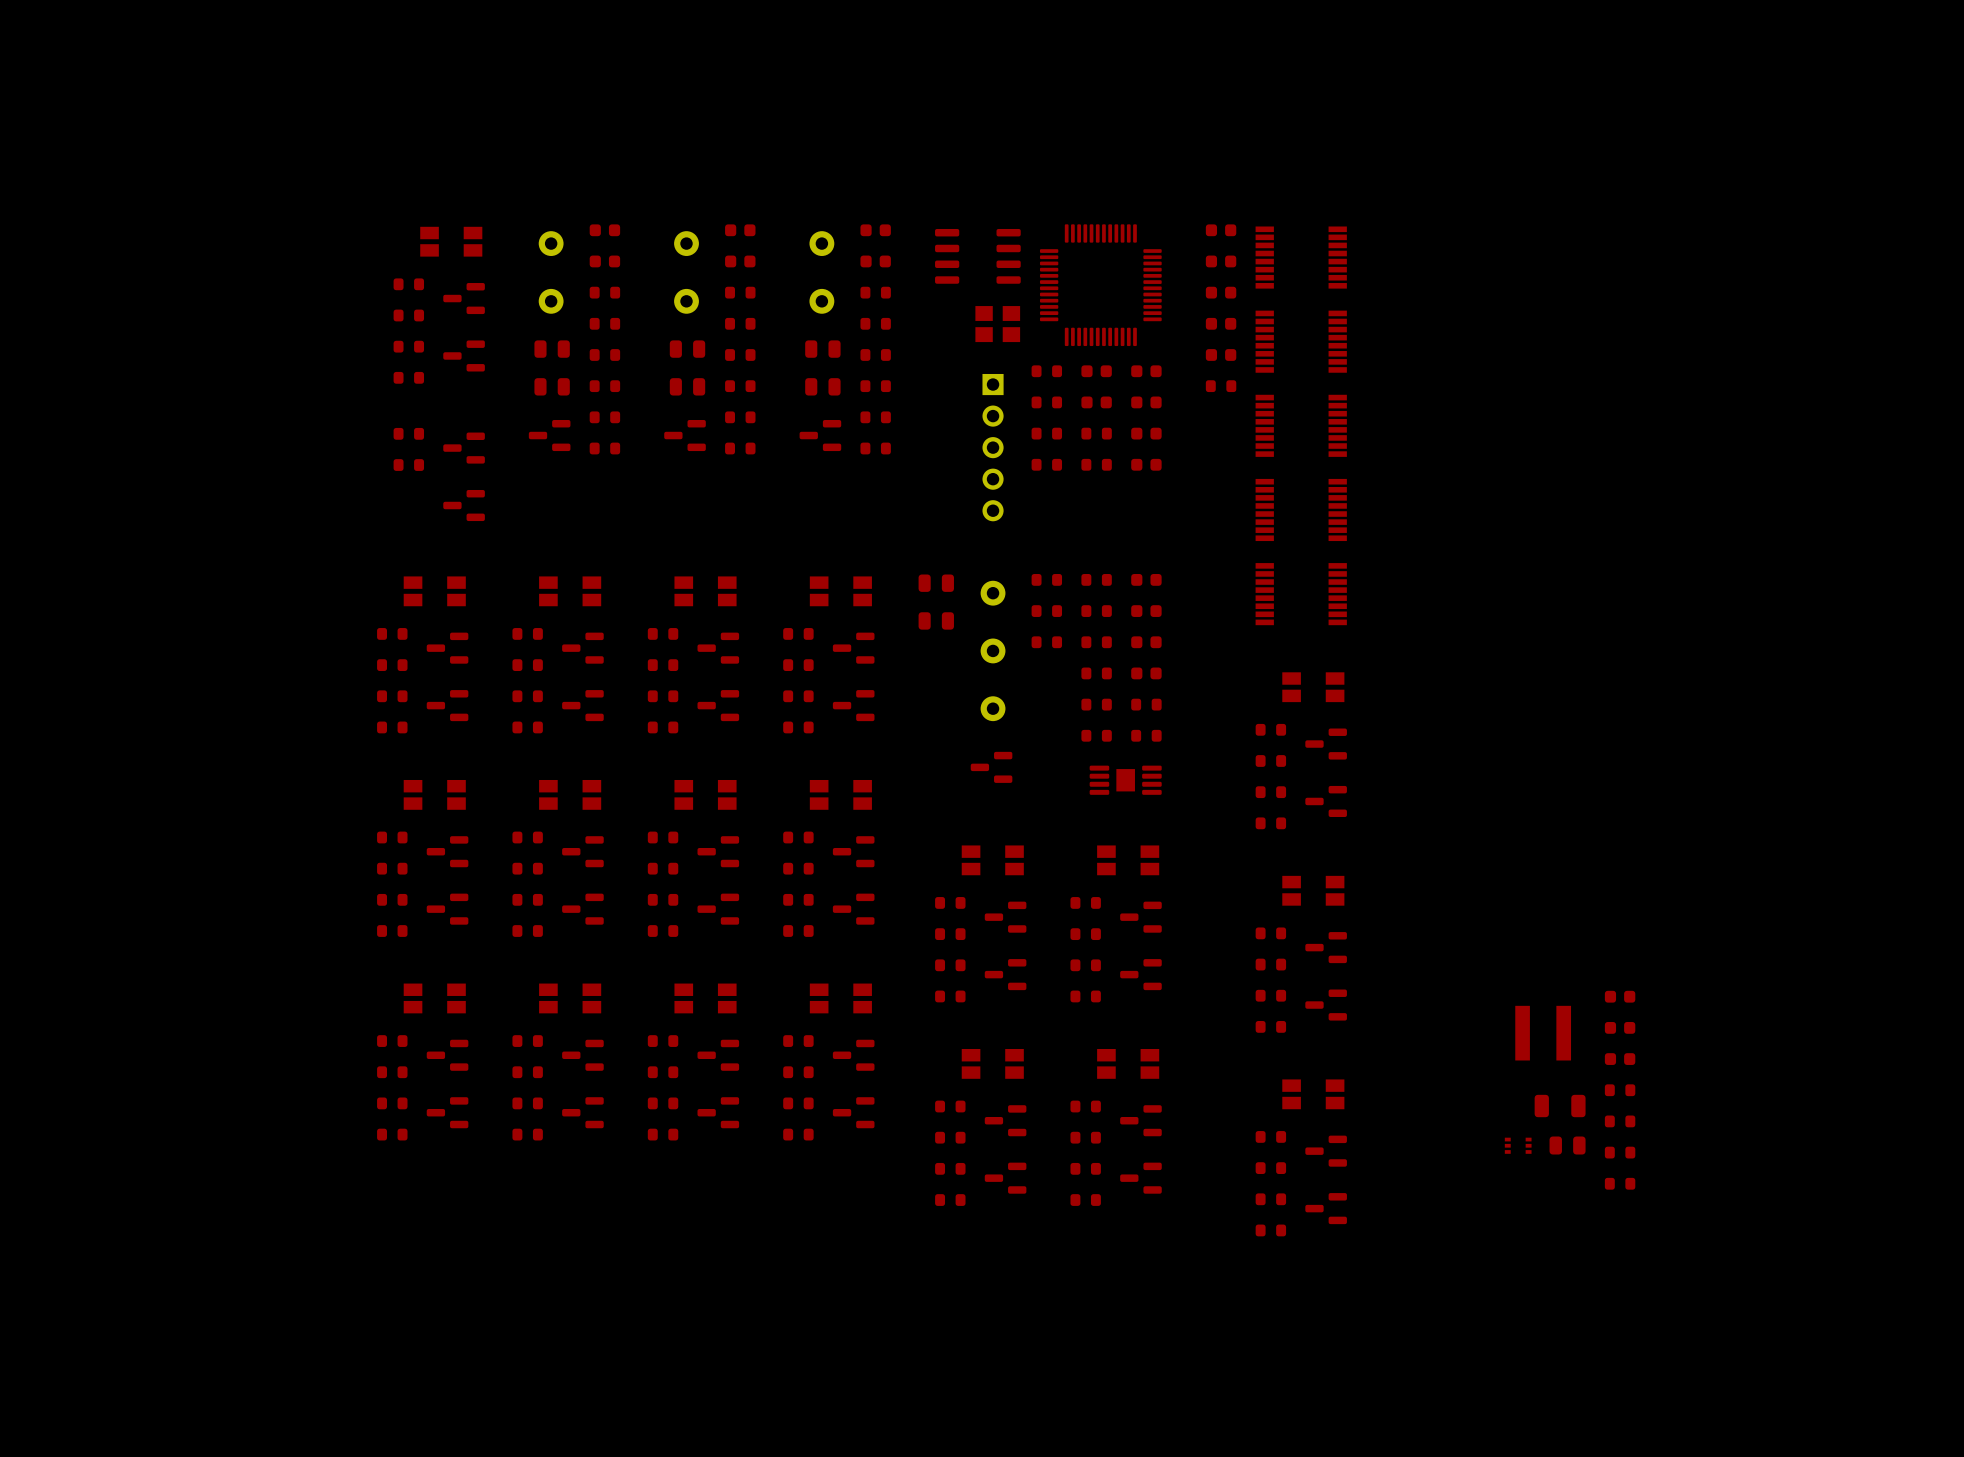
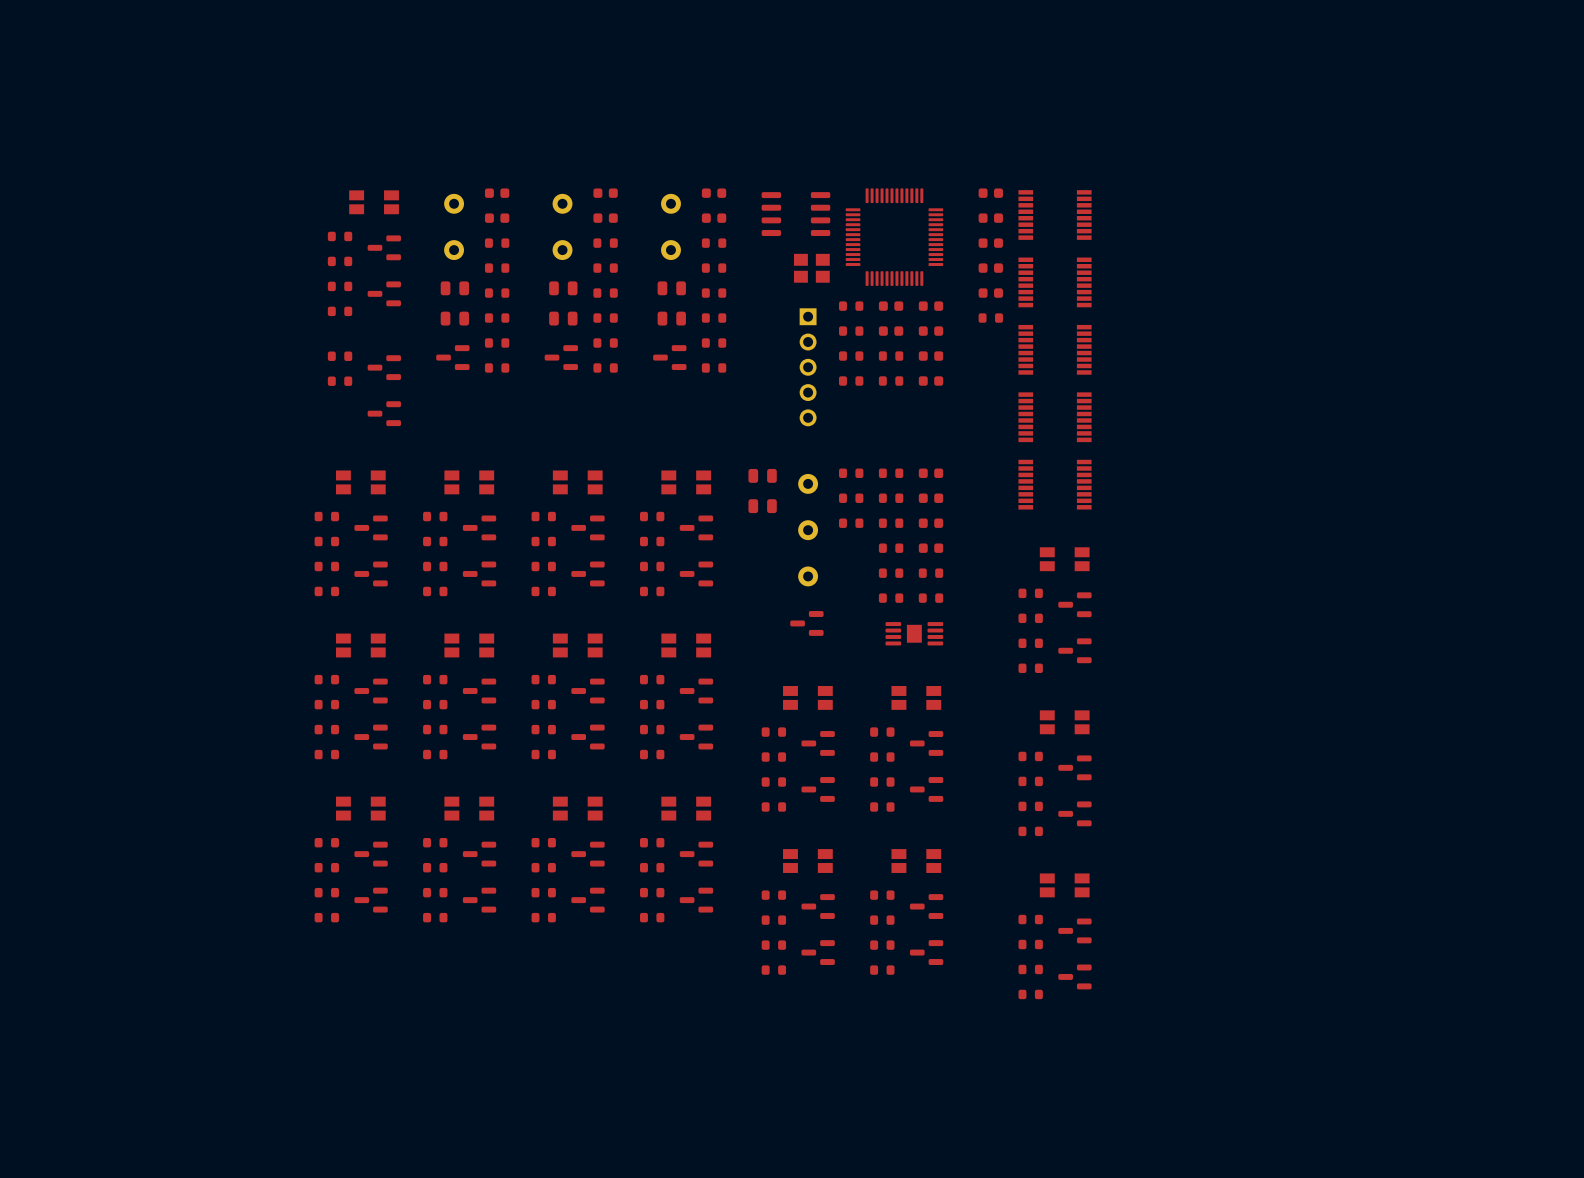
part: (1620, 996) -> none
part: (1620, 1027) -> none
part: (1543, 1033) -> none
part: (1620, 1059) -> none
part: (1620, 1090) -> none
part: (1560, 1106) -> none
part: (1620, 1121) -> none
part: (1518, 1145) -> none
part: (1567, 1145) -> none
part: (1620, 1152) -> none
part: (1620, 1183) -> none

